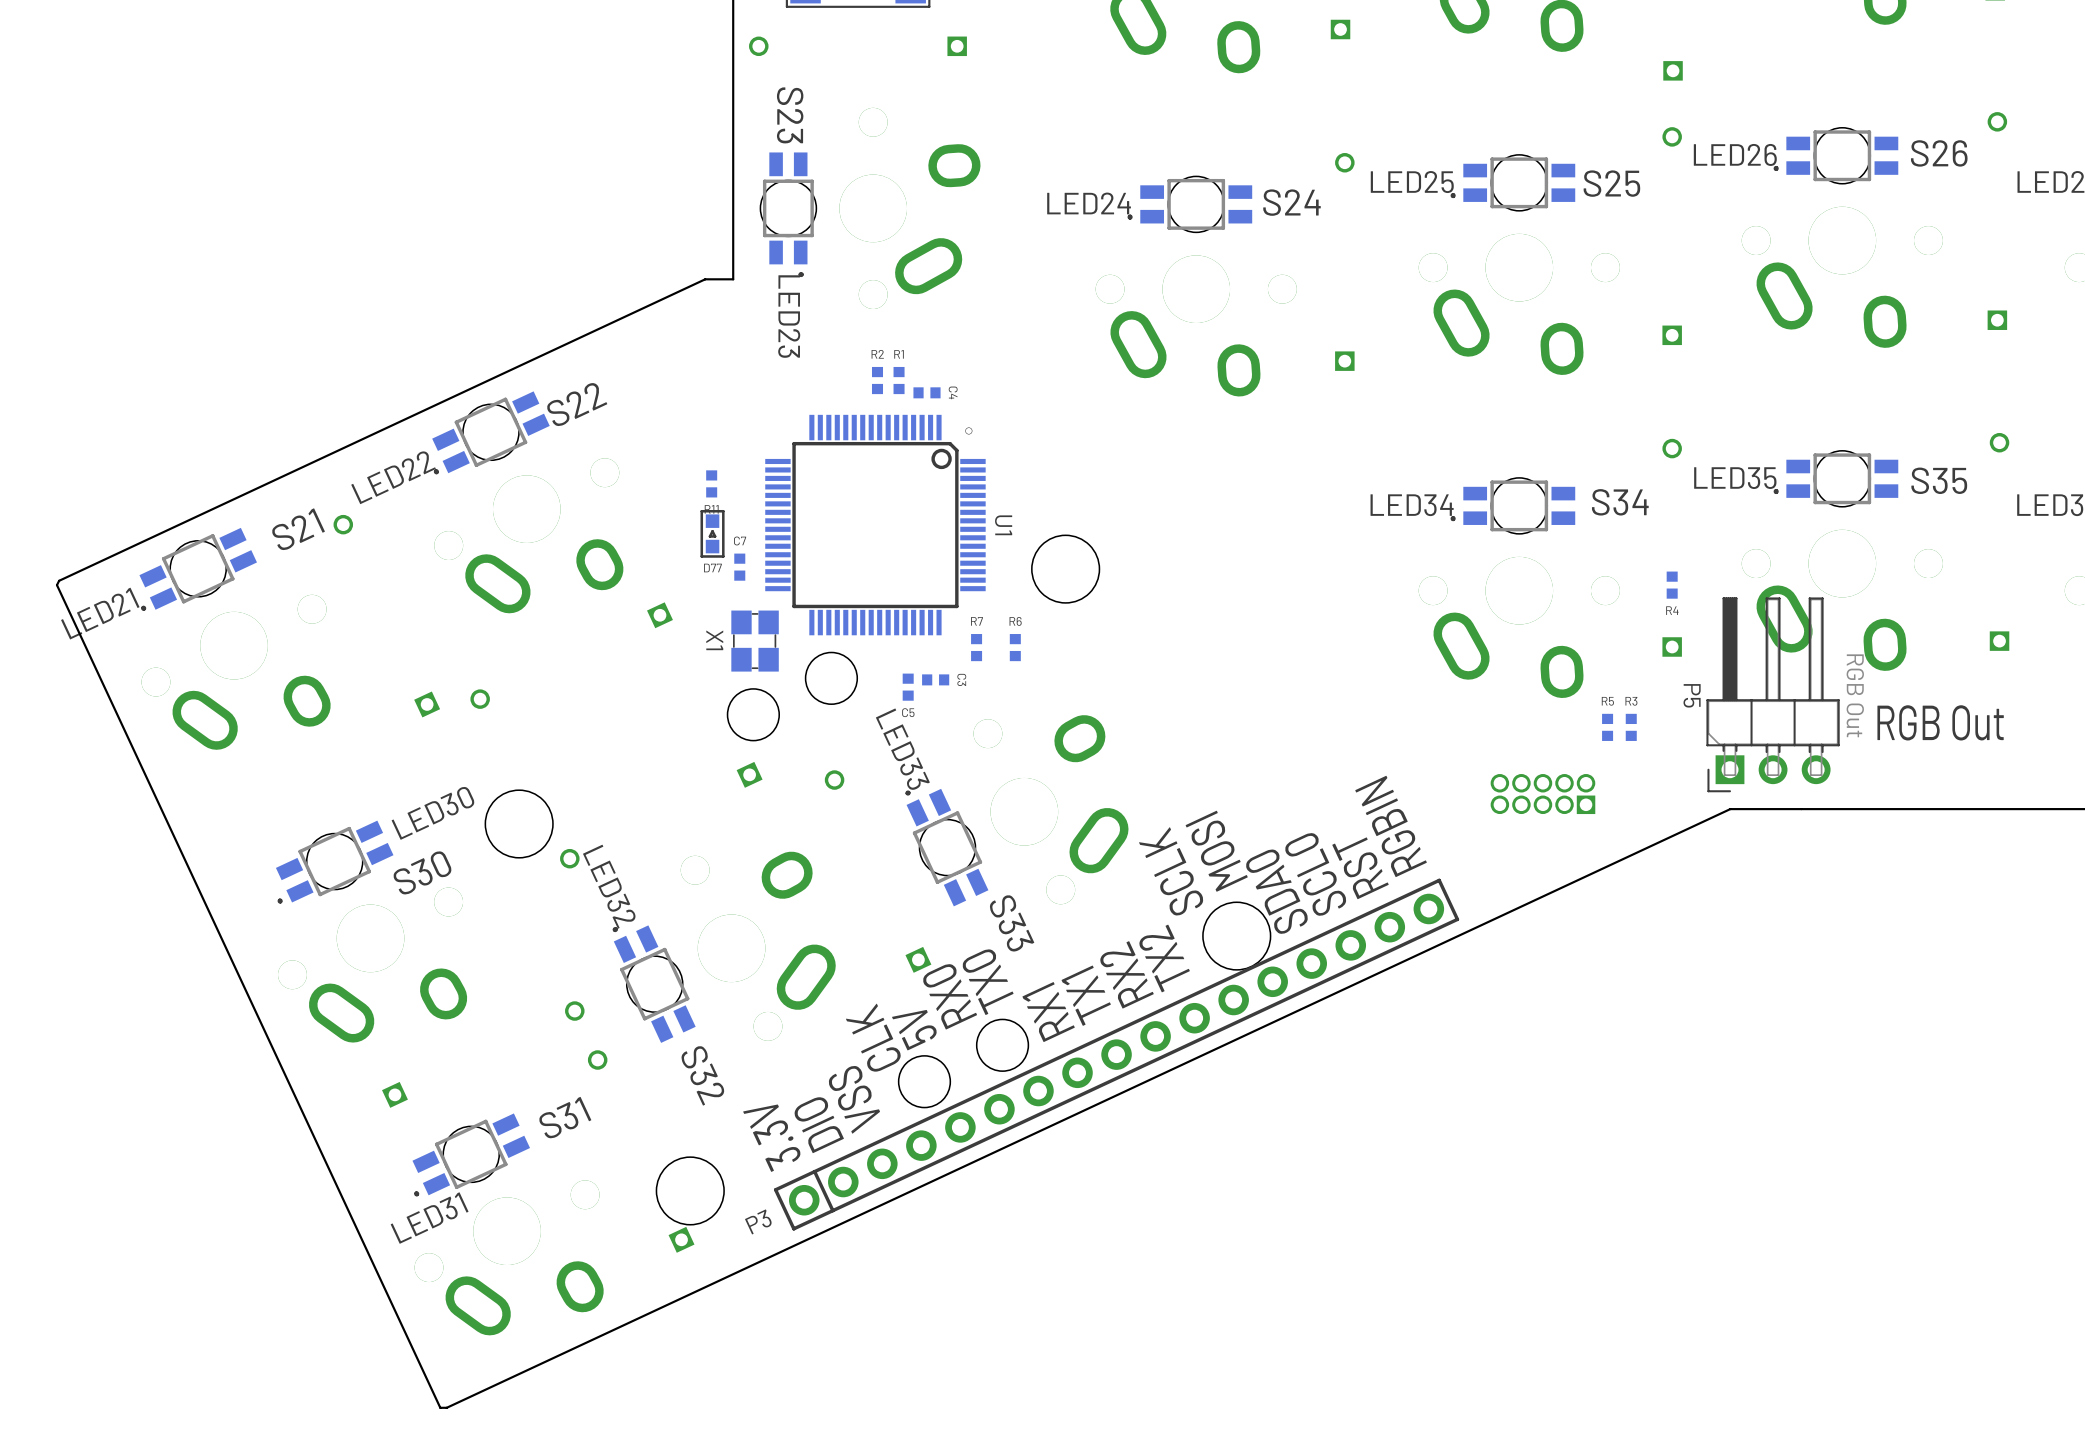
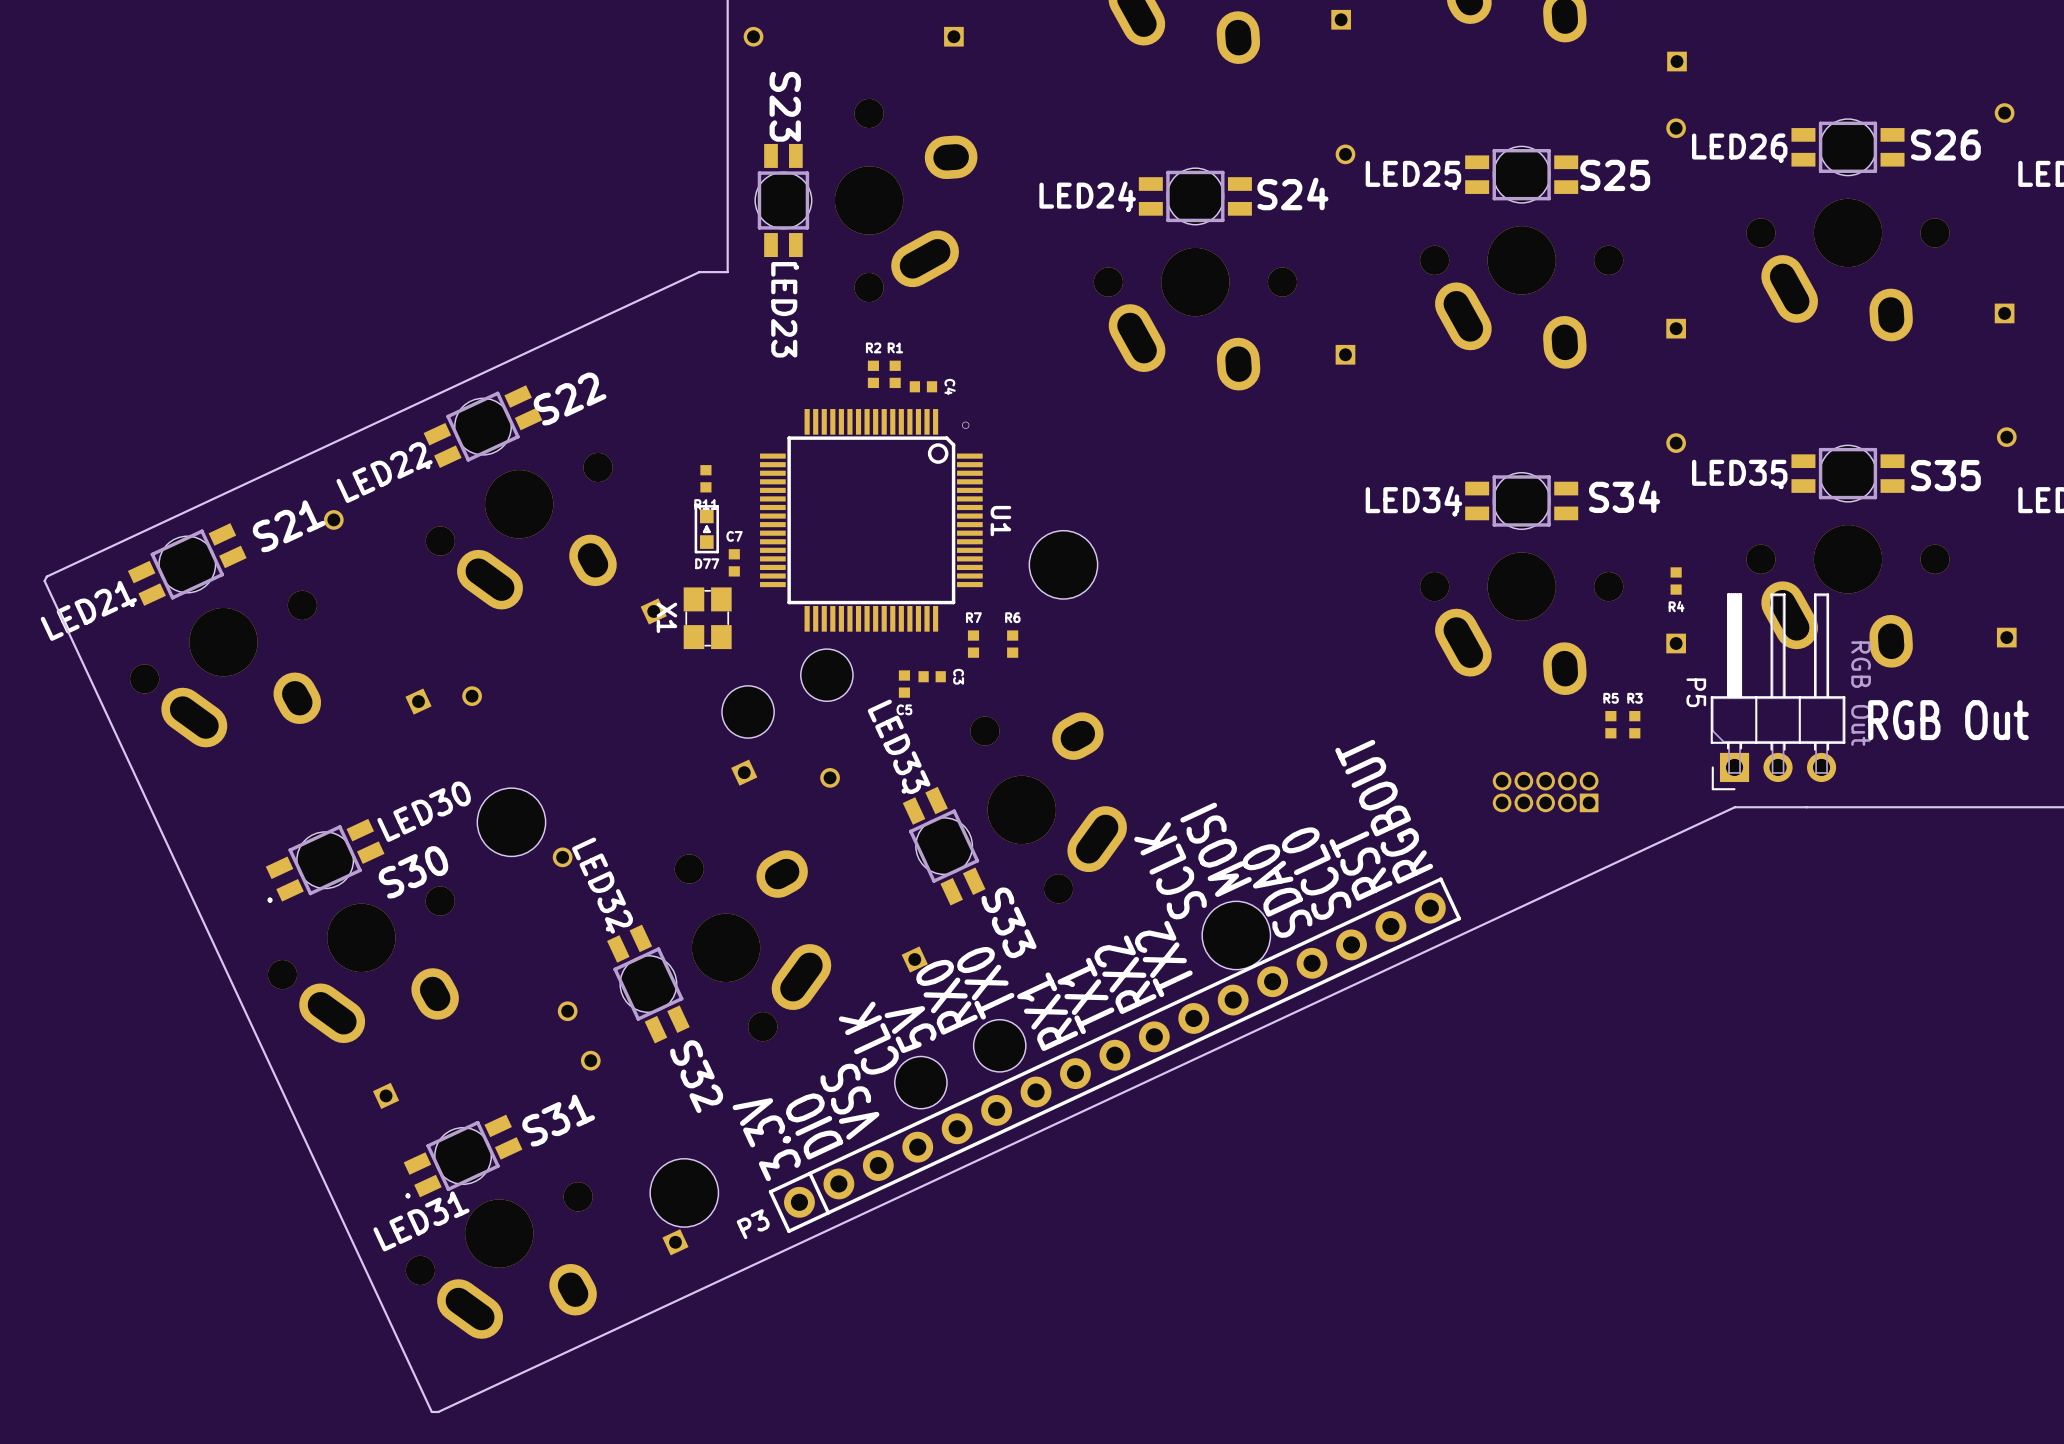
X1 position: (755, 641) -> (707, 618)
text: RGBIN (1391, 826) -> RGBOUT (1384, 811)

